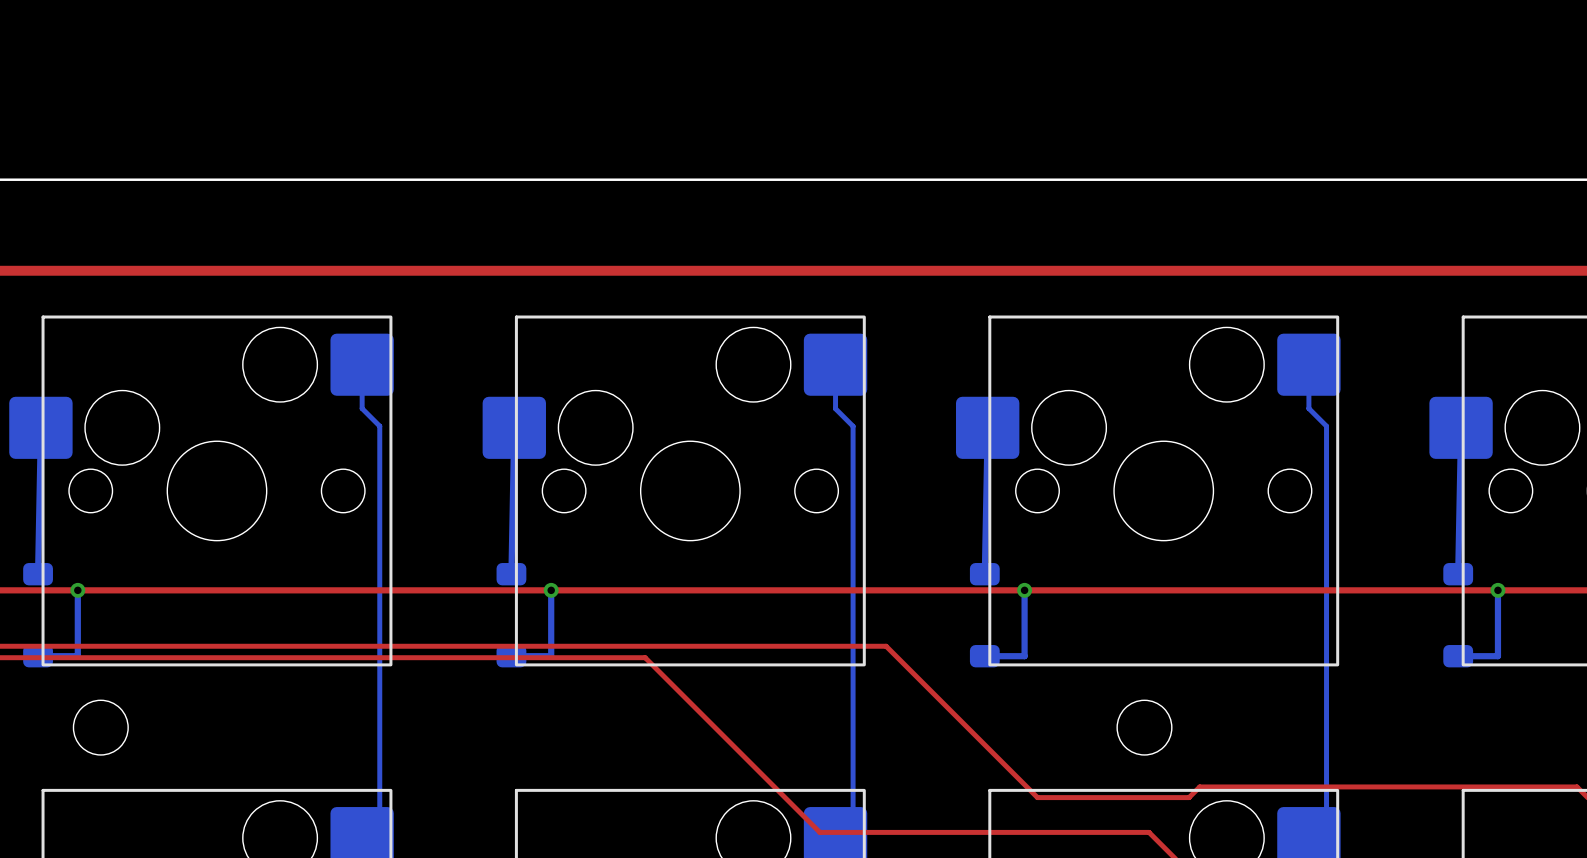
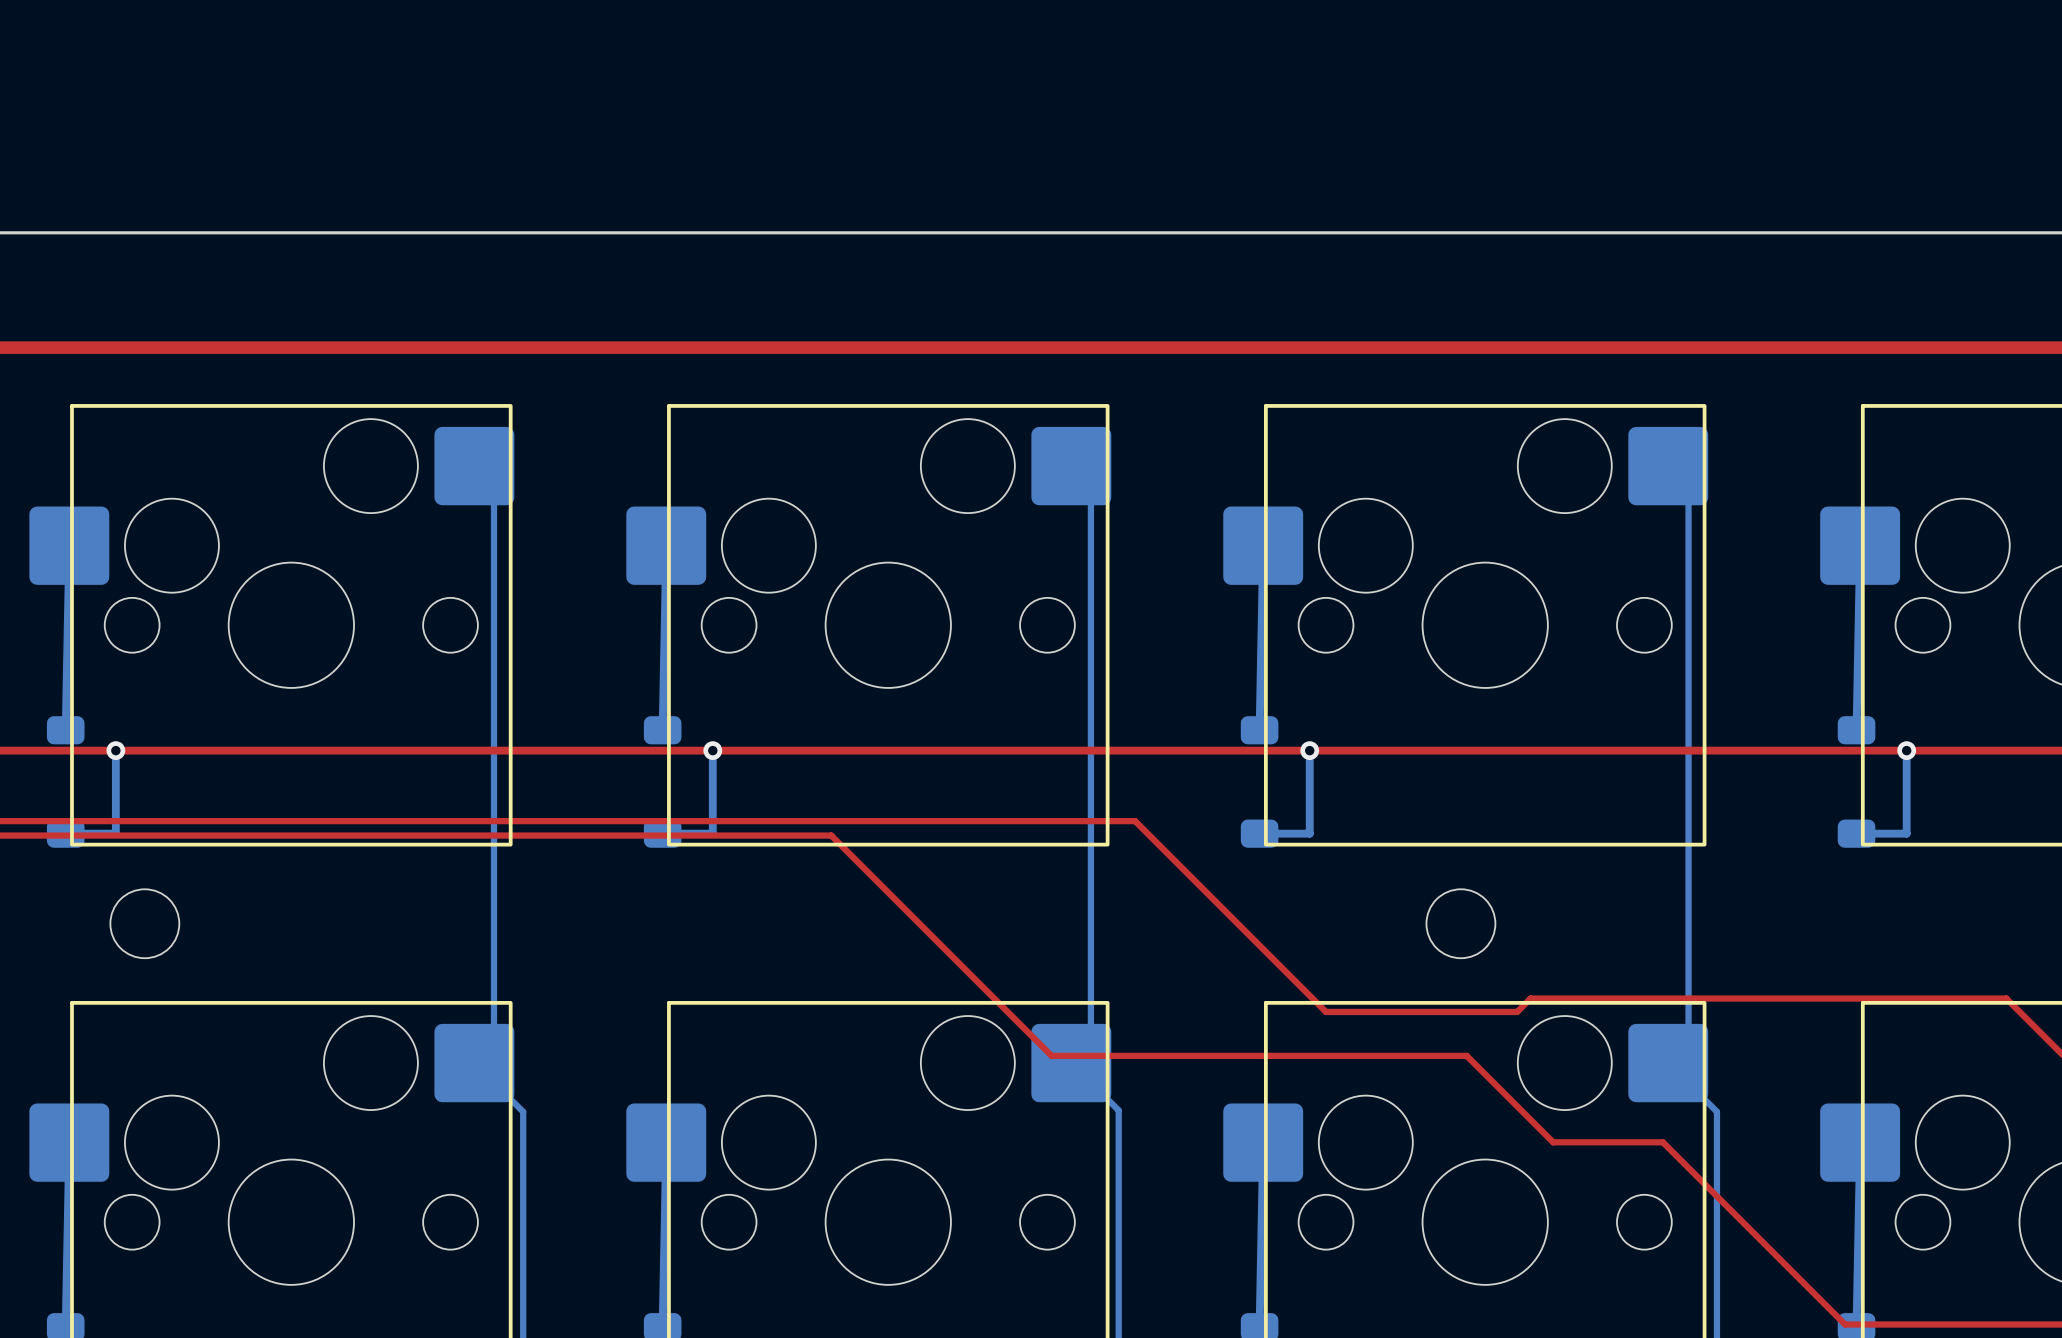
bottom track: (362, 364) (362, 408) (379, 426) (379, 820) (377, 822) -> (474, 466) (493, 485) (493, 1043)
bottom track: (835, 364) (835, 408) (853, 426) (853, 820) (851, 822) -> (1071, 466) (1090, 485) (1090, 1043)
bottom track: (1308, 364) (1308, 408) (1326, 426) (1326, 820) (1324, 822) -> (1668, 466) (1688, 486) (1688, 1042)

